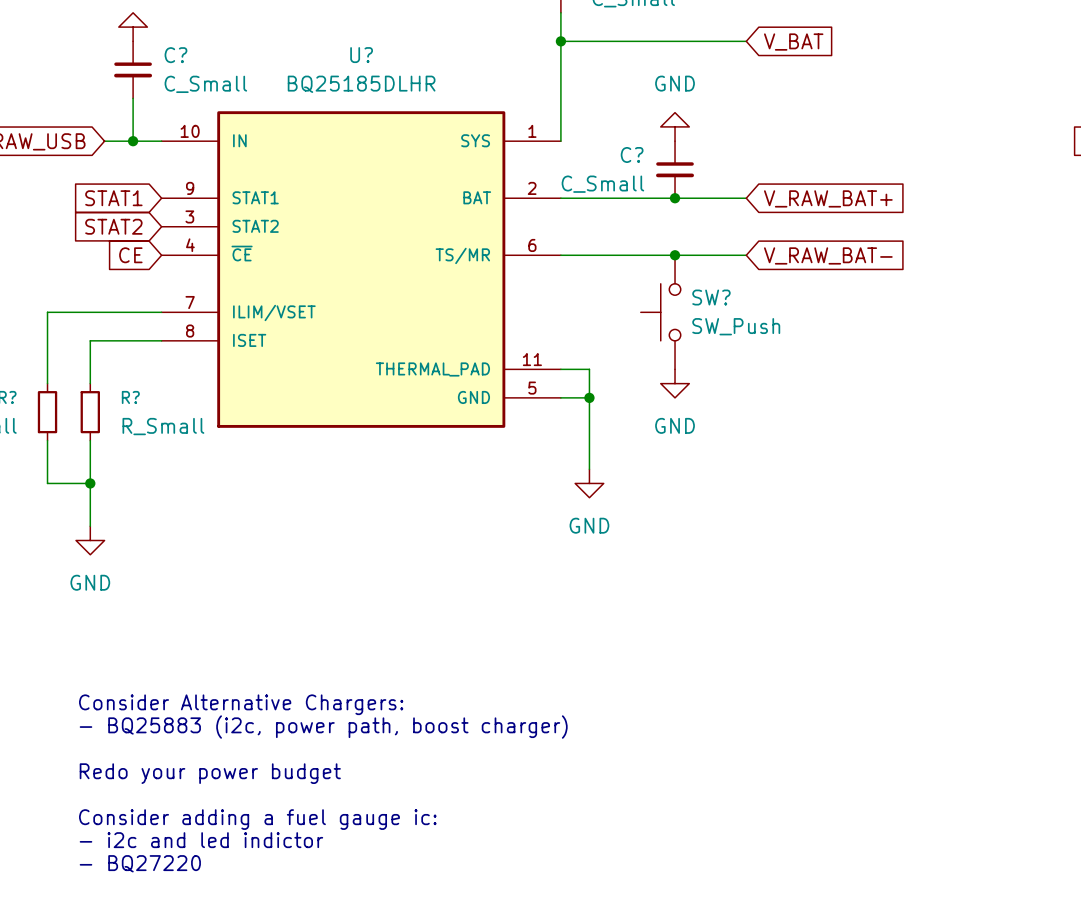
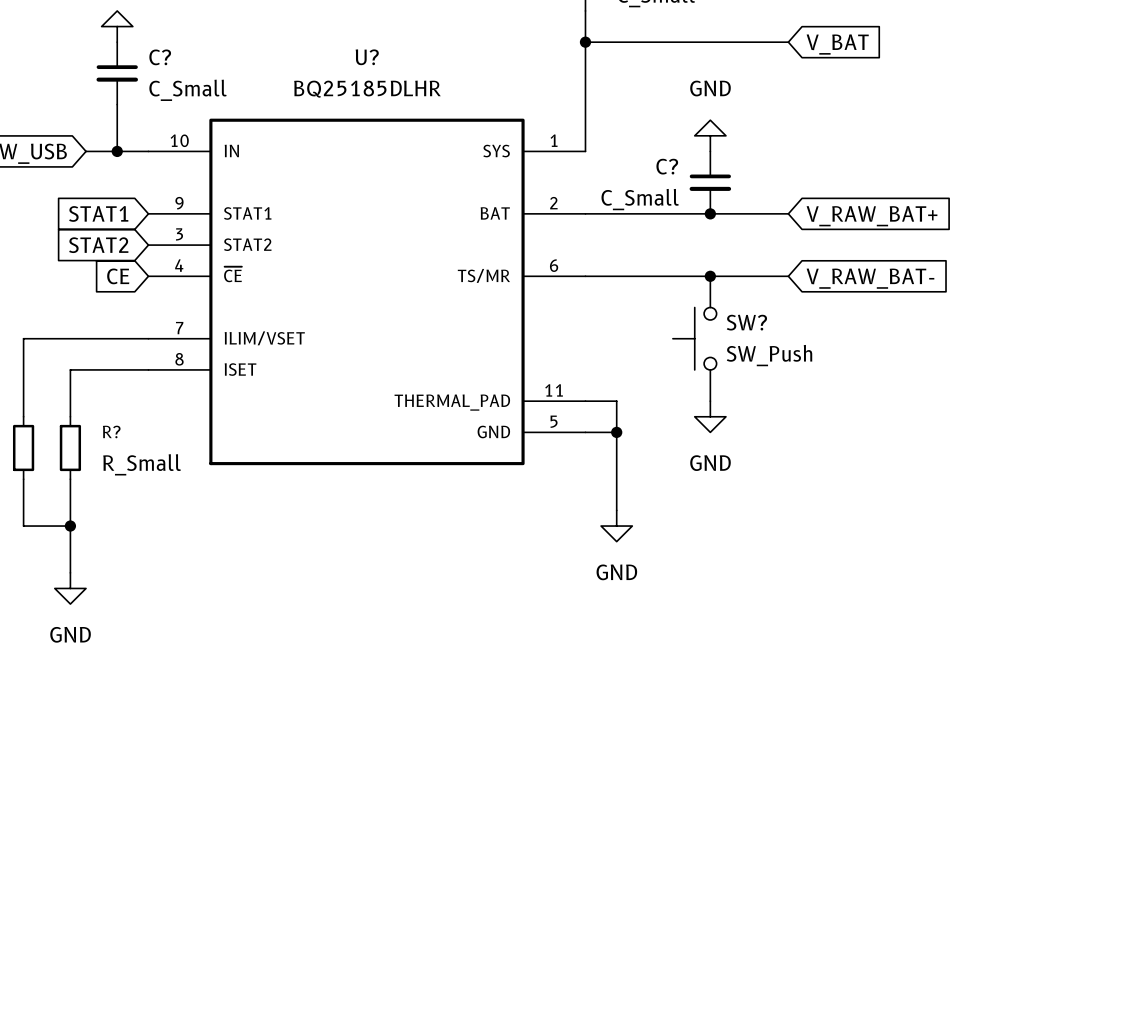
text: Consider Alternative Chargers: (241, 704) -> none
text: - BQ25883 (i2c, power path, boost charger) (323, 727) -> none
text: Redo your power budget (210, 773) -> none
text: Consider adding a fuel gauge ic: (257, 819) -> none
text: - i2c and led indictor (201, 840) -> none
text: - BQ27220 (140, 863) -> none

